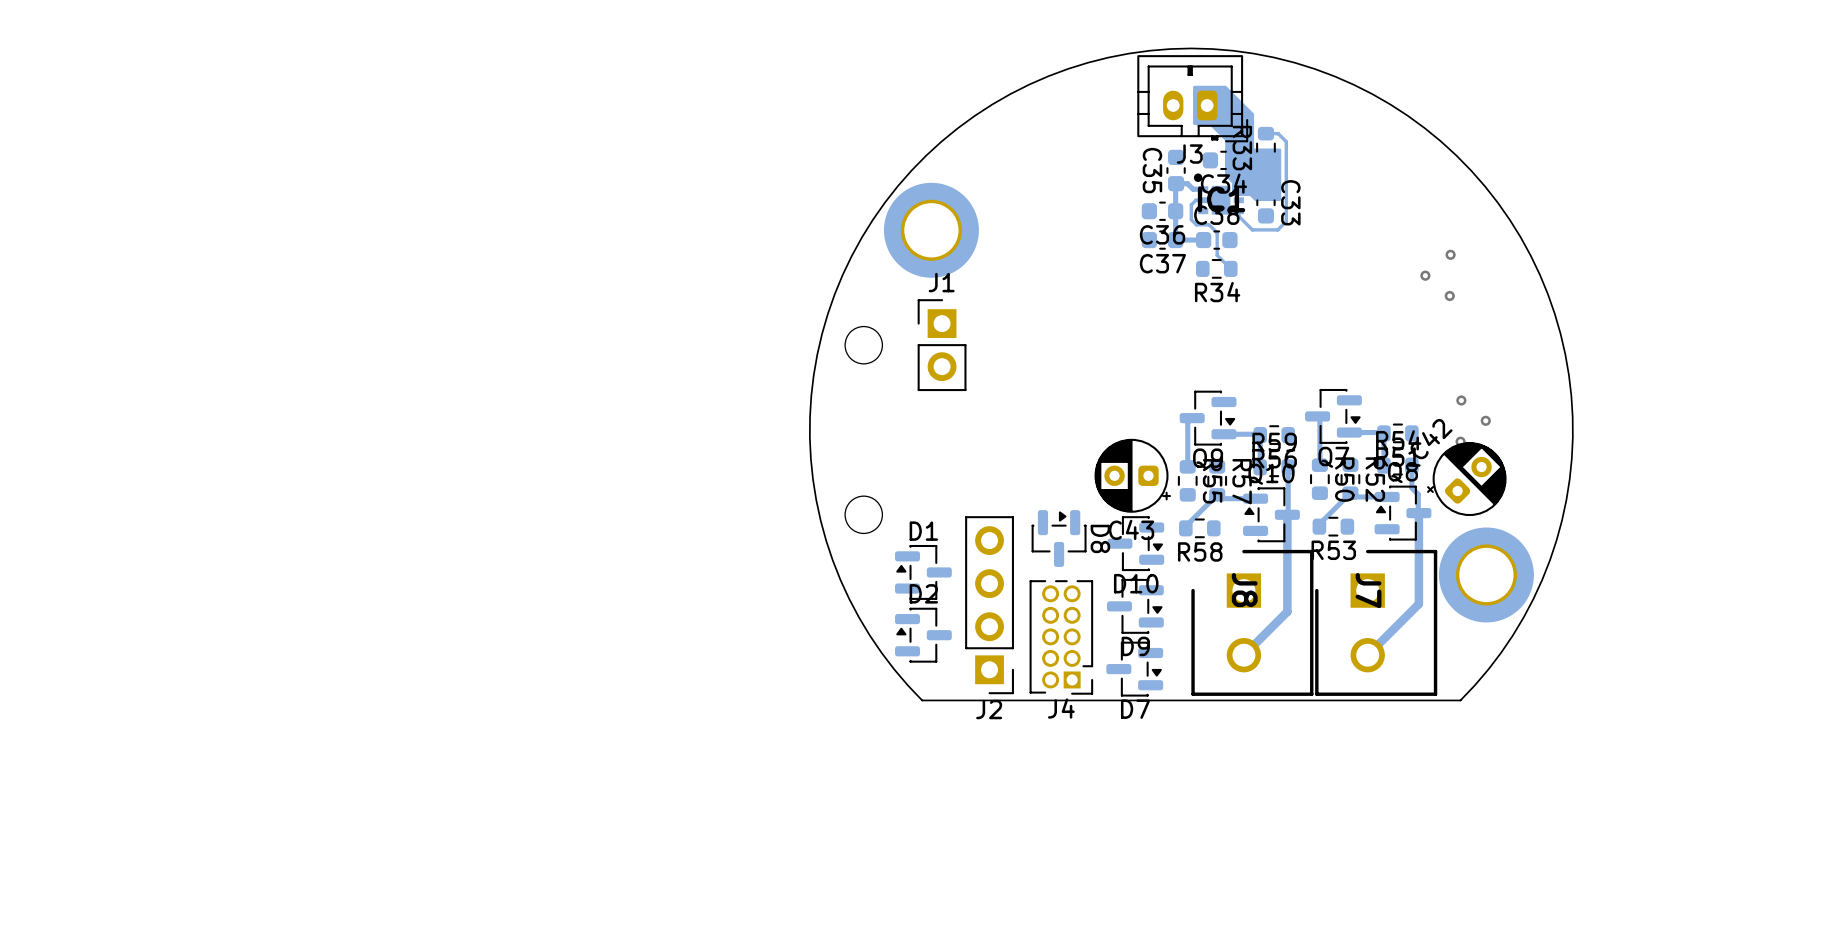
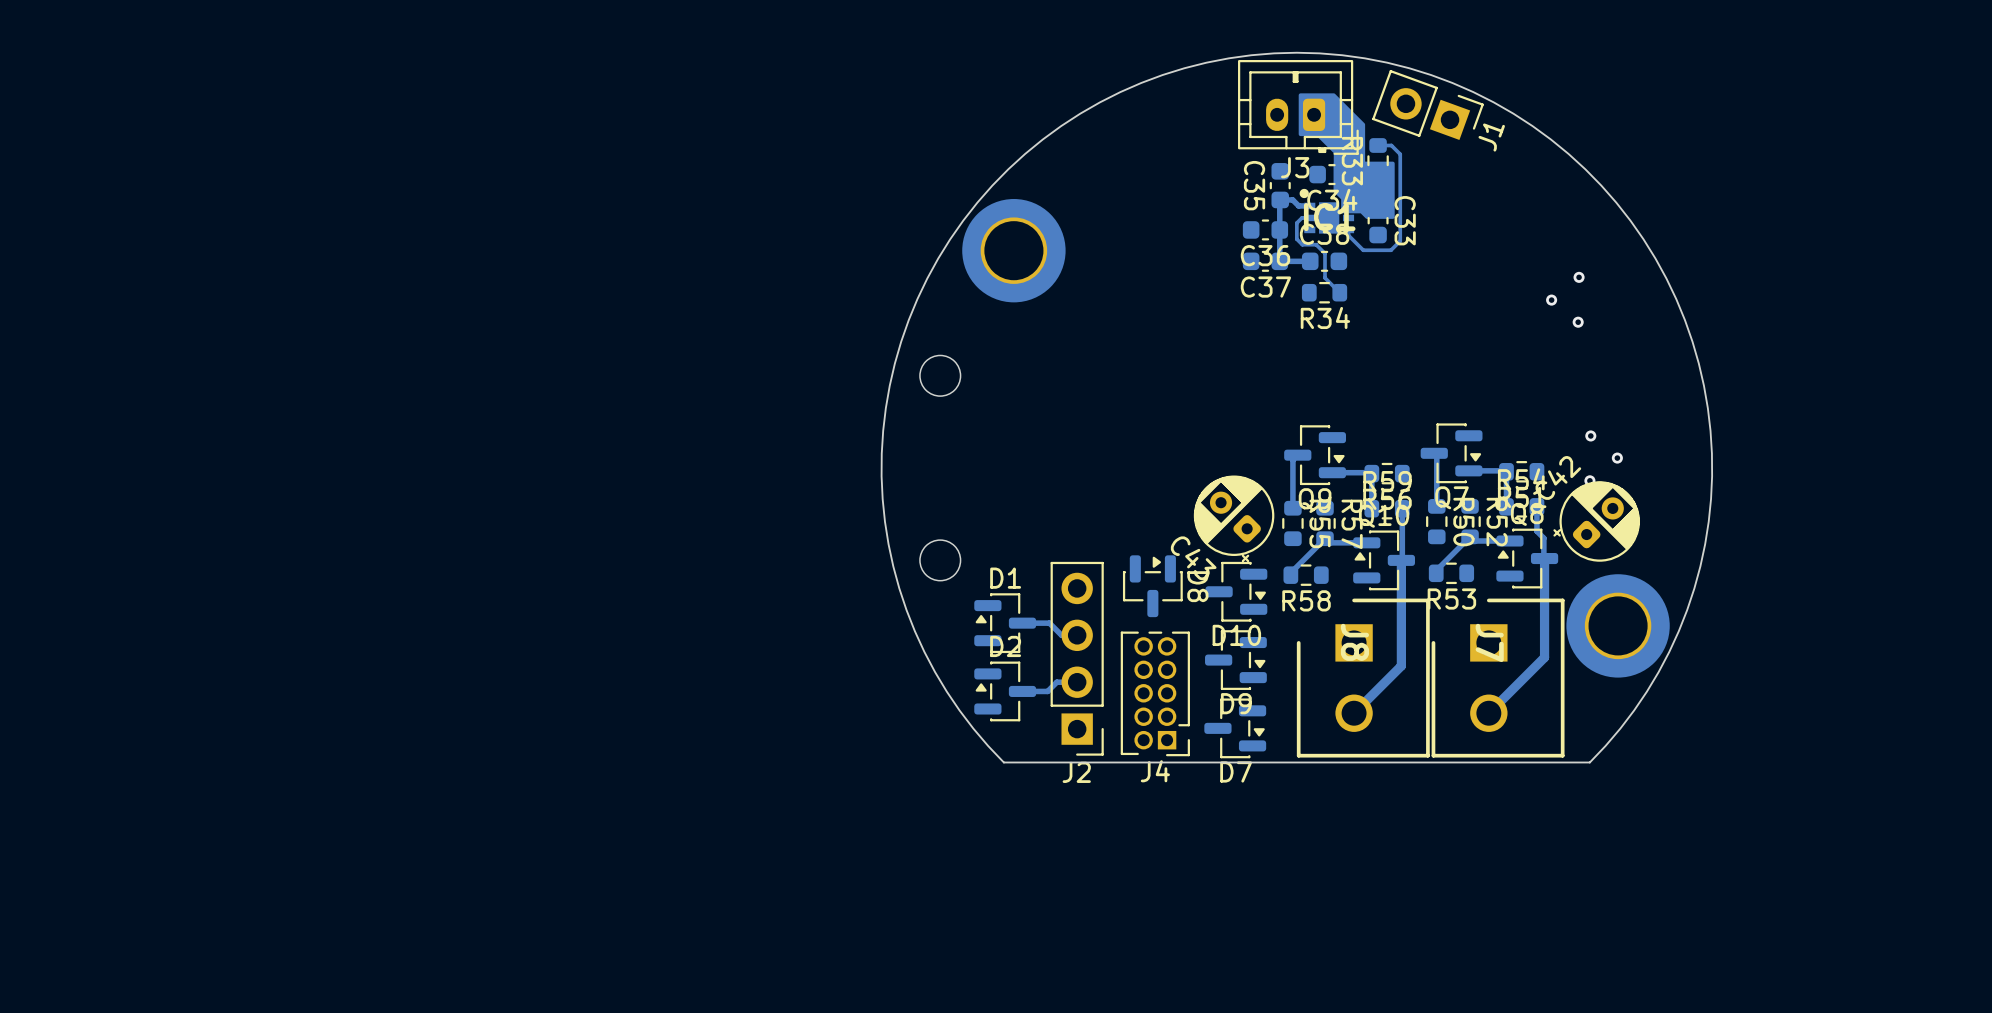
J1 rotation: 0° (942, 345) -> 110° clockwise (1428, 105)
J1 position: (942, 345) -> (1428, 105)
C43 rotation: 0° (1132, 475) -> 45° clockwise (1234, 518)
track: none -> (1022, 623) (1049, 623) (1061, 635) (1077, 635)
track: none -> (1077, 682) (1056, 682) (1047, 691) (1022, 691)

